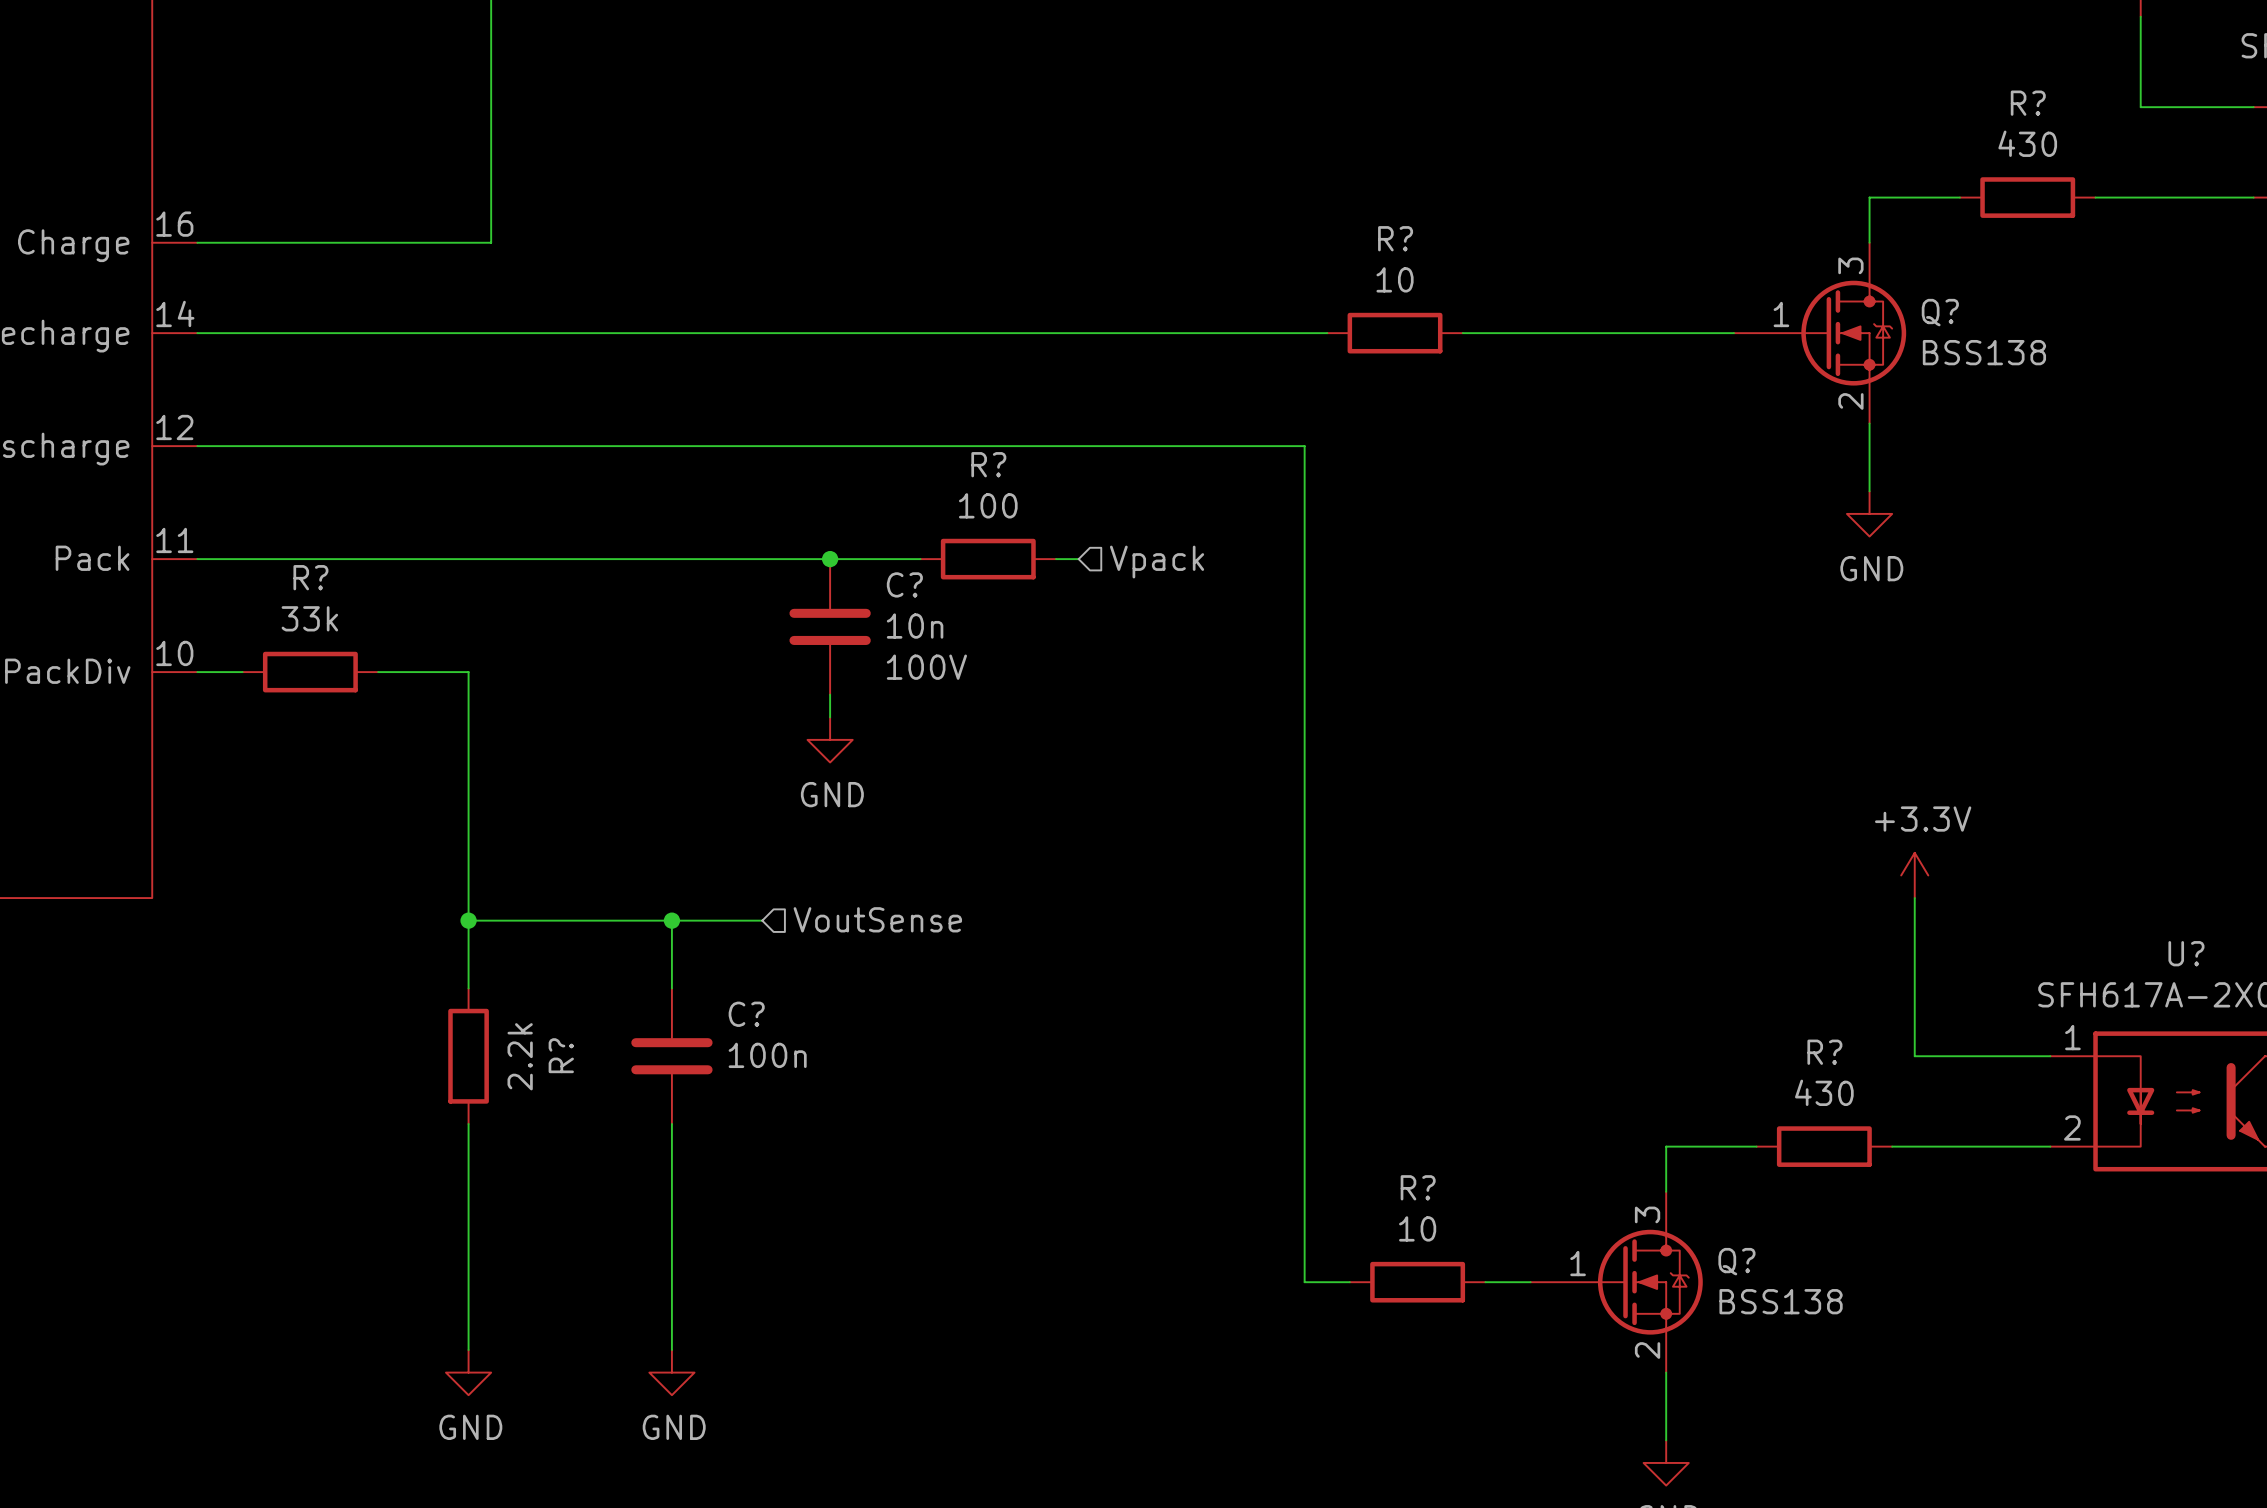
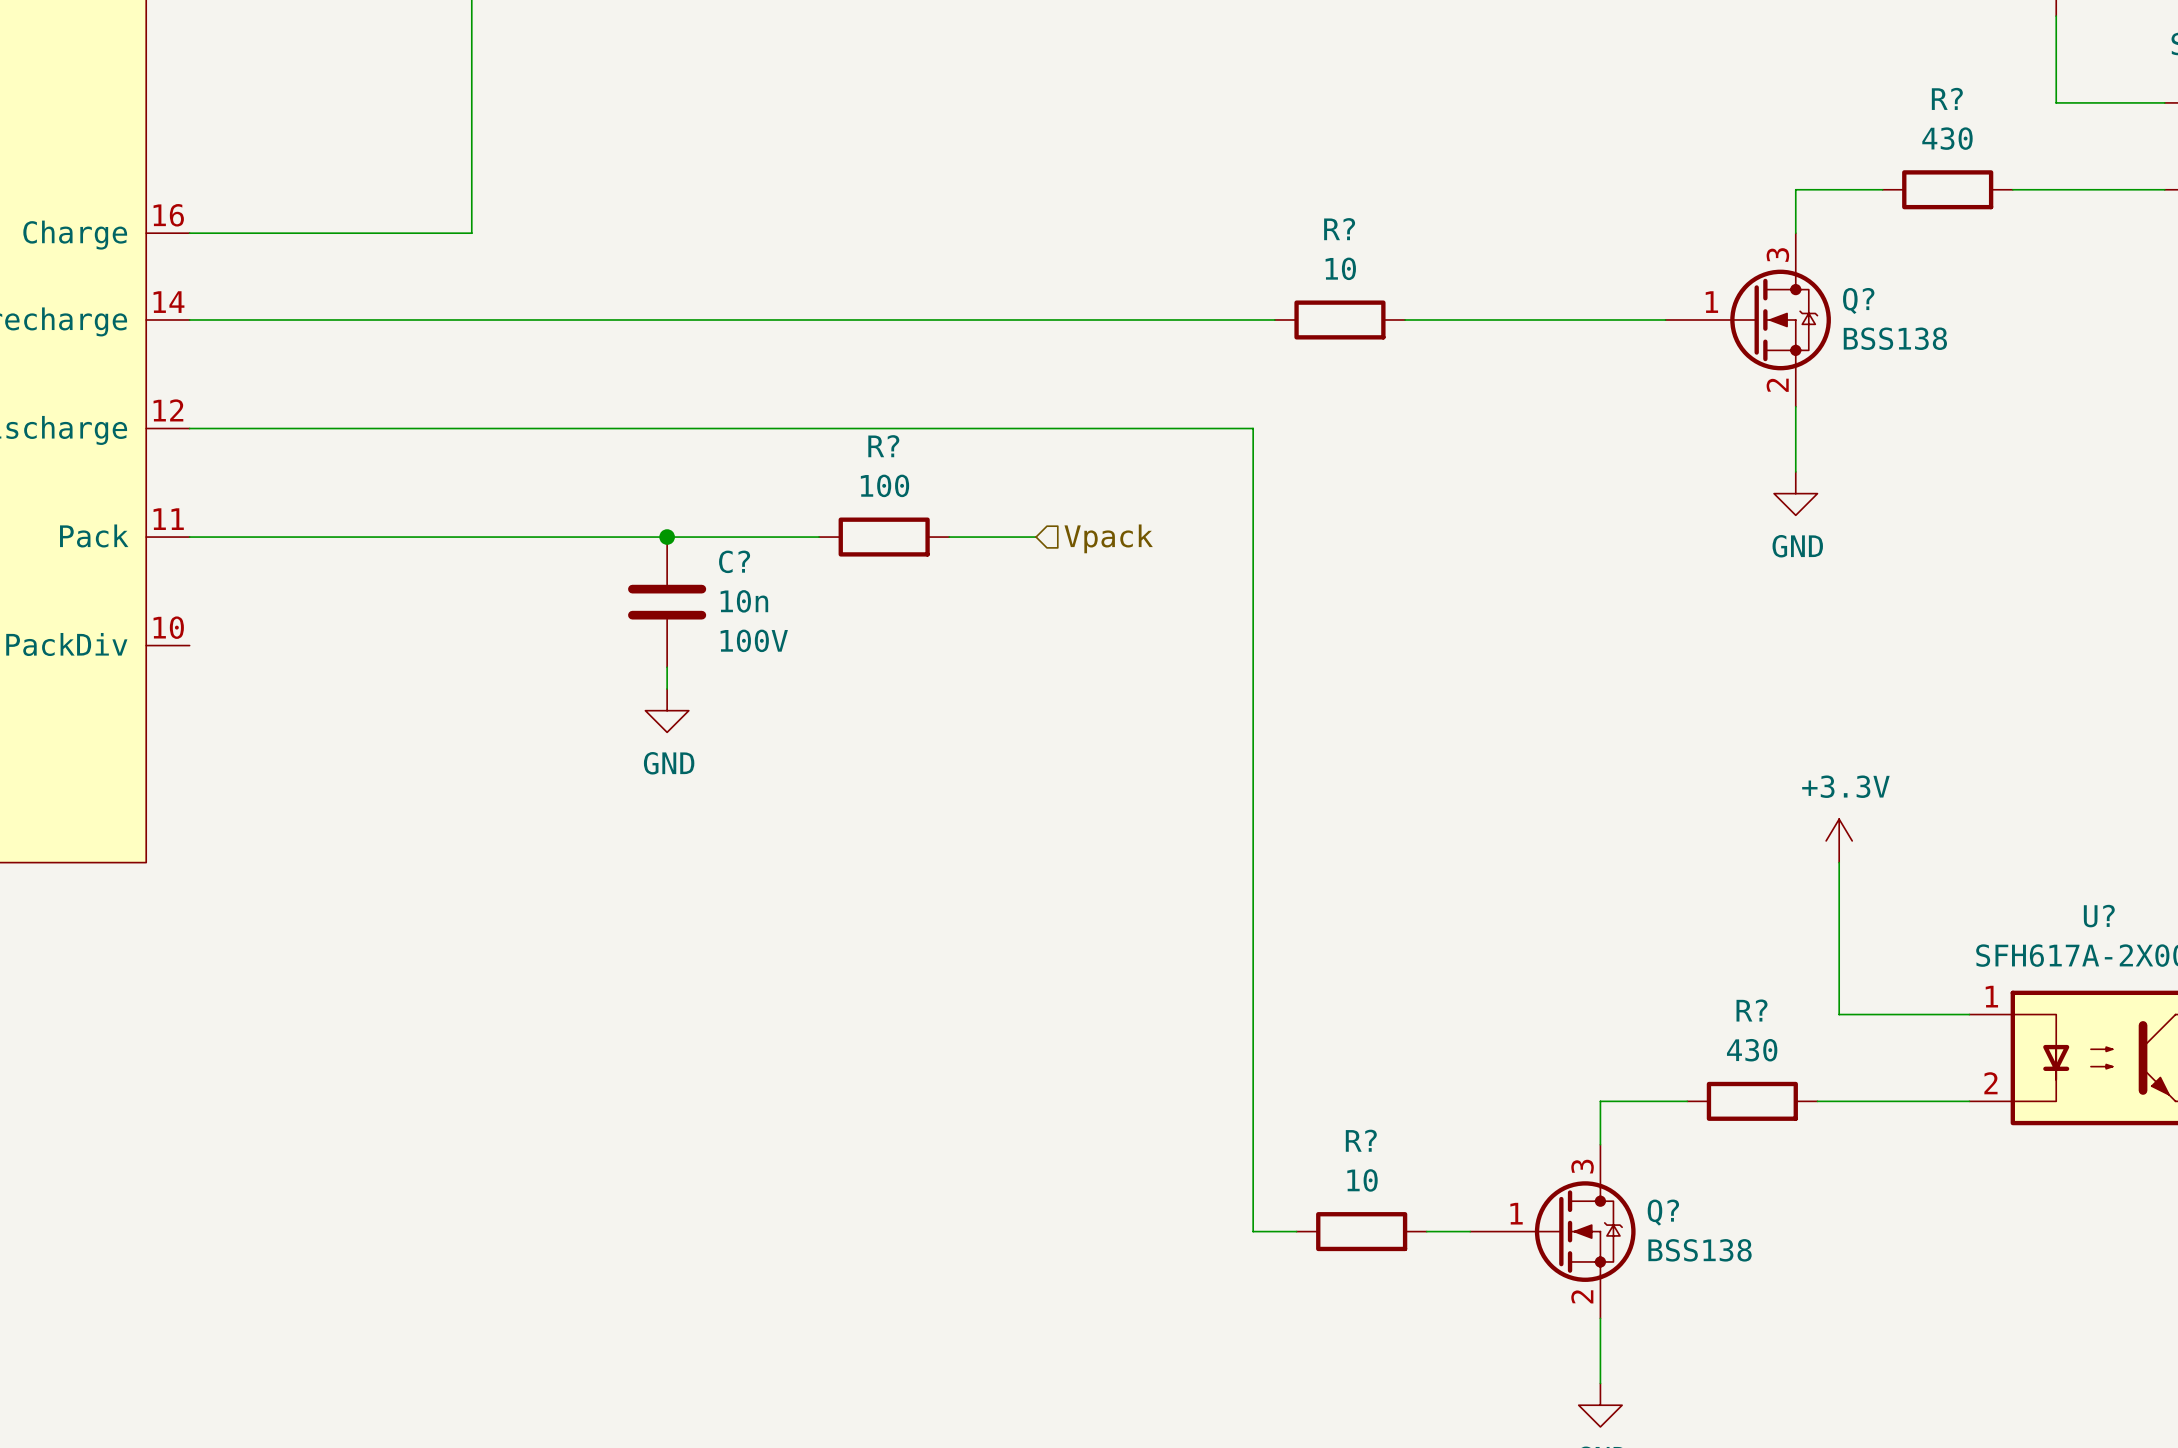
junction: none -> (667, 537)
junction: (830, 559) -> none
wire: (852, 559) (920, 559) -> (949, 537) (1014, 537)
R? position: (988, 559) -> (884, 537)
C? position: (830, 626) -> (667, 602)
wire: (197, 672) (242, 672) -> none
R?: 33k (310, 672) -> none
wire: (378, 672) (468, 672) (468, 988) -> none
wire: (830, 694) (830, 717) -> (667, 667) (667, 688)
power symbol position: GND (830, 739) -> GND (667, 710)
hierarchical label: VoutSense (877, 919) -> none
wire: (468, 920) (762, 920) -> none
junction: (468, 920) -> none
wire: (671, 920) (671, 988) -> none
junction: (671, 920) -> none
R?: 2.2k (468, 1056) -> none
C?: 100n (671, 1056) -> none
wire: (468, 1124) (468, 1349) -> none
wire: (671, 1124) (671, 1349) -> none
power symbol: GND (468, 1372) -> none
power symbol: GND (671, 1372) -> none

